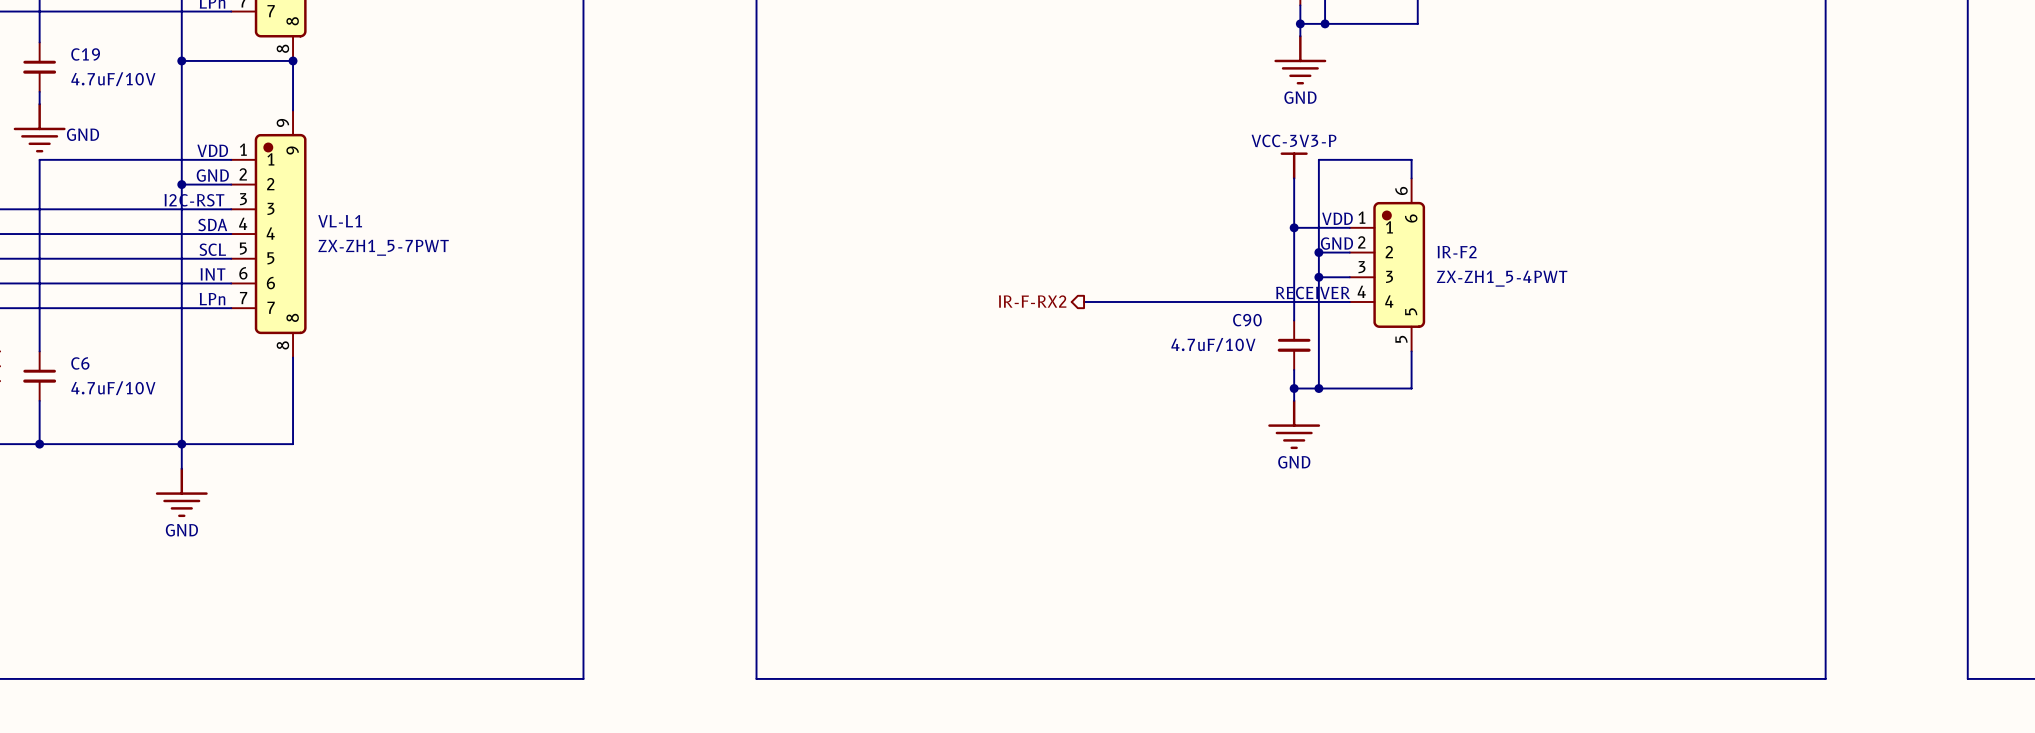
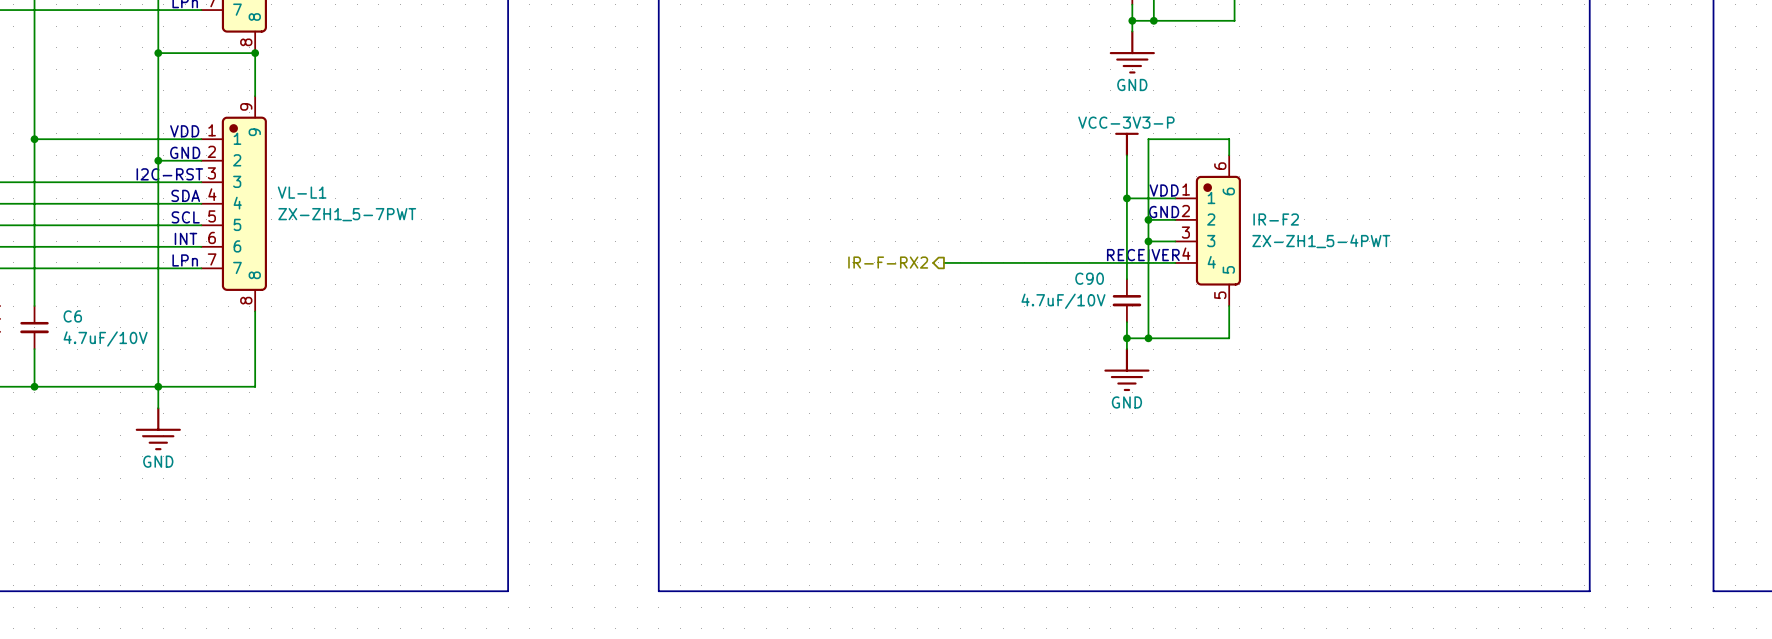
C19: 4.7uF/10V (39, 67) -> none
power symbol: GND (39, 127) -> none
junction: none -> (34, 139)

